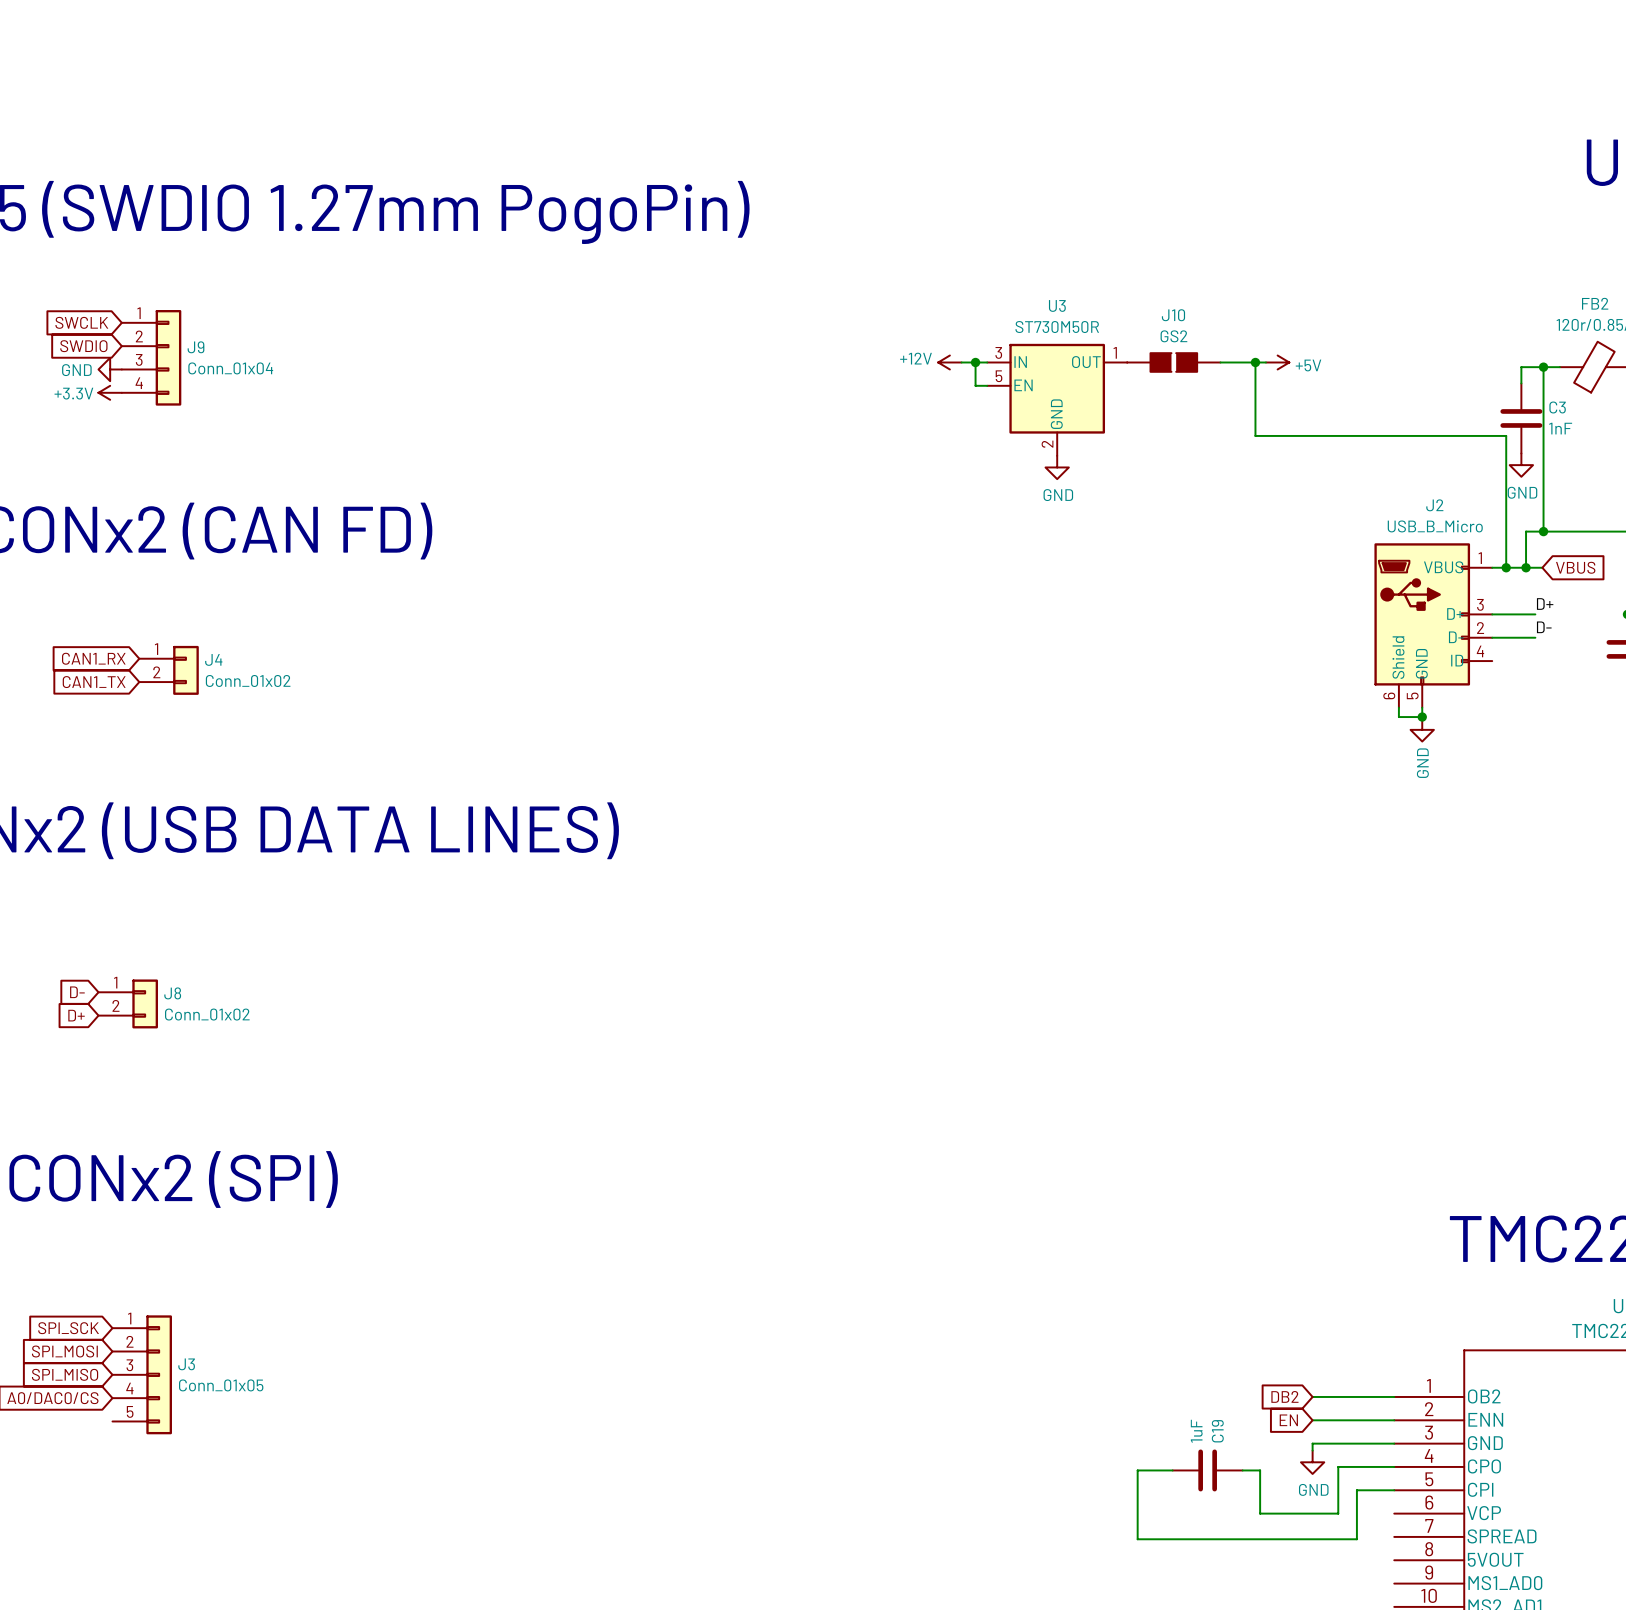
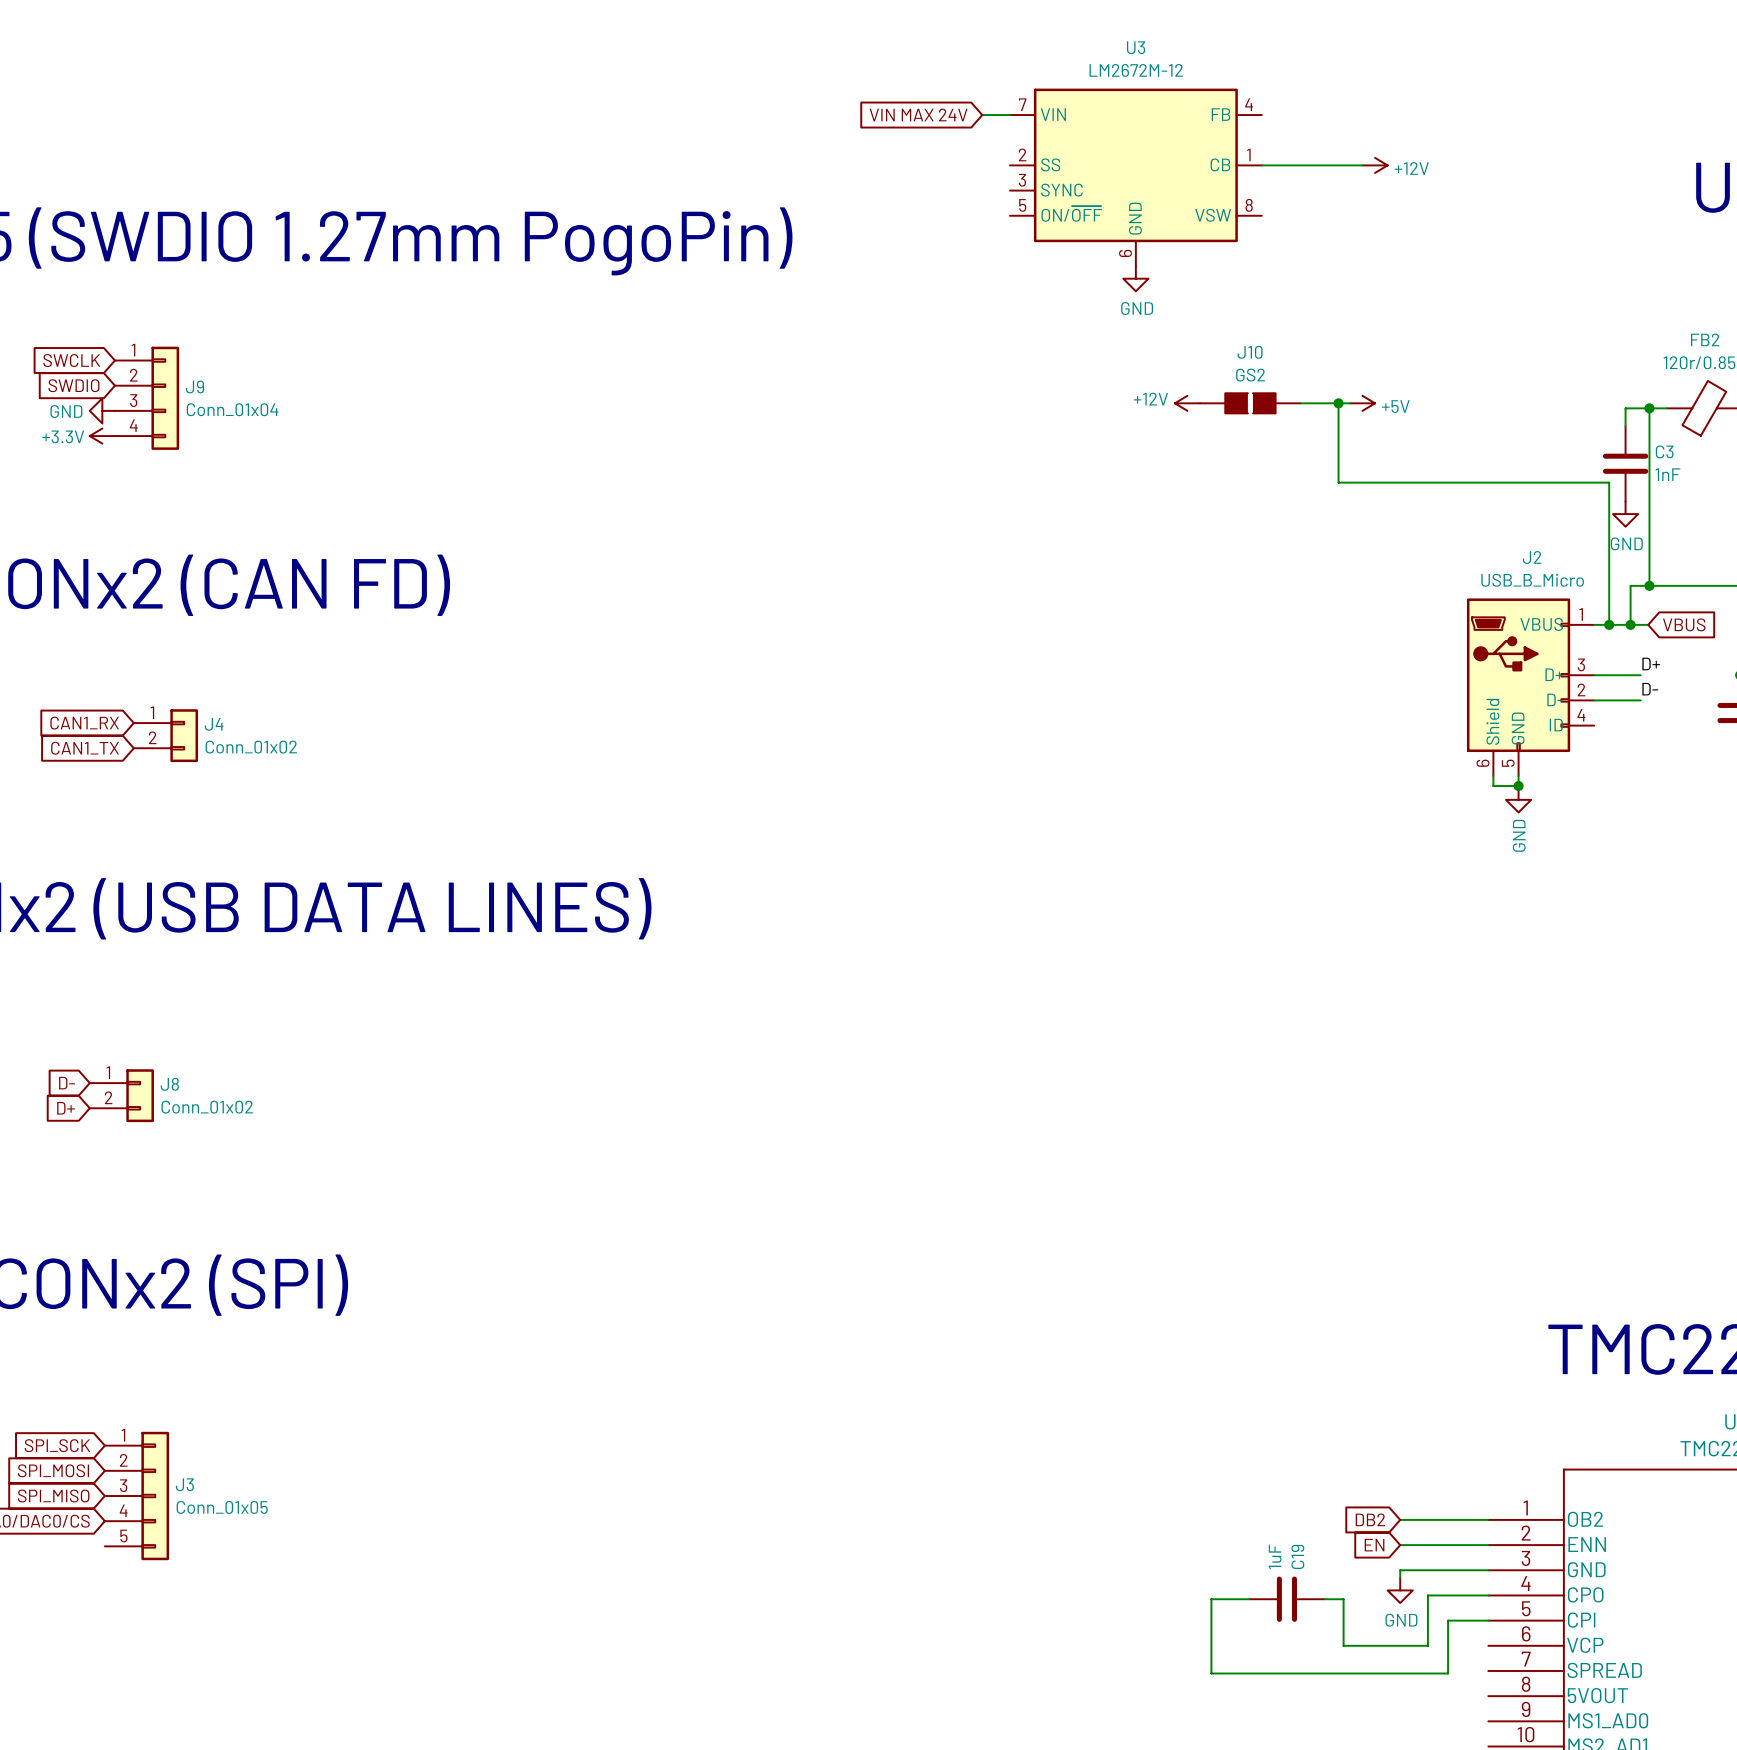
global label: none -> VIN MAX 24V (918, 114)
wire: none -> (982, 115) (1009, 115)
wire: none -> (1261, 165) (1362, 165)
power symbol: none -> +12V (1375, 165)
U3 name position: U3 (1057, 305) -> U3 (1136, 47)
U3 value: ST730M50R (1057, 327) -> LM2672M-12 (1136, 70)
U3 symbol: [987, 343, 1128, 456] -> [1009, 88, 1262, 267]
power symbol position: +12V (949, 362) -> +12V (1187, 403)
wire: (961, 362) (987, 362) -> none
wire: (975, 362) (975, 385) (987, 385) -> none
junction: (975, 362) -> none
power symbol position: GND (1057, 467) -> GND (1135, 278)

